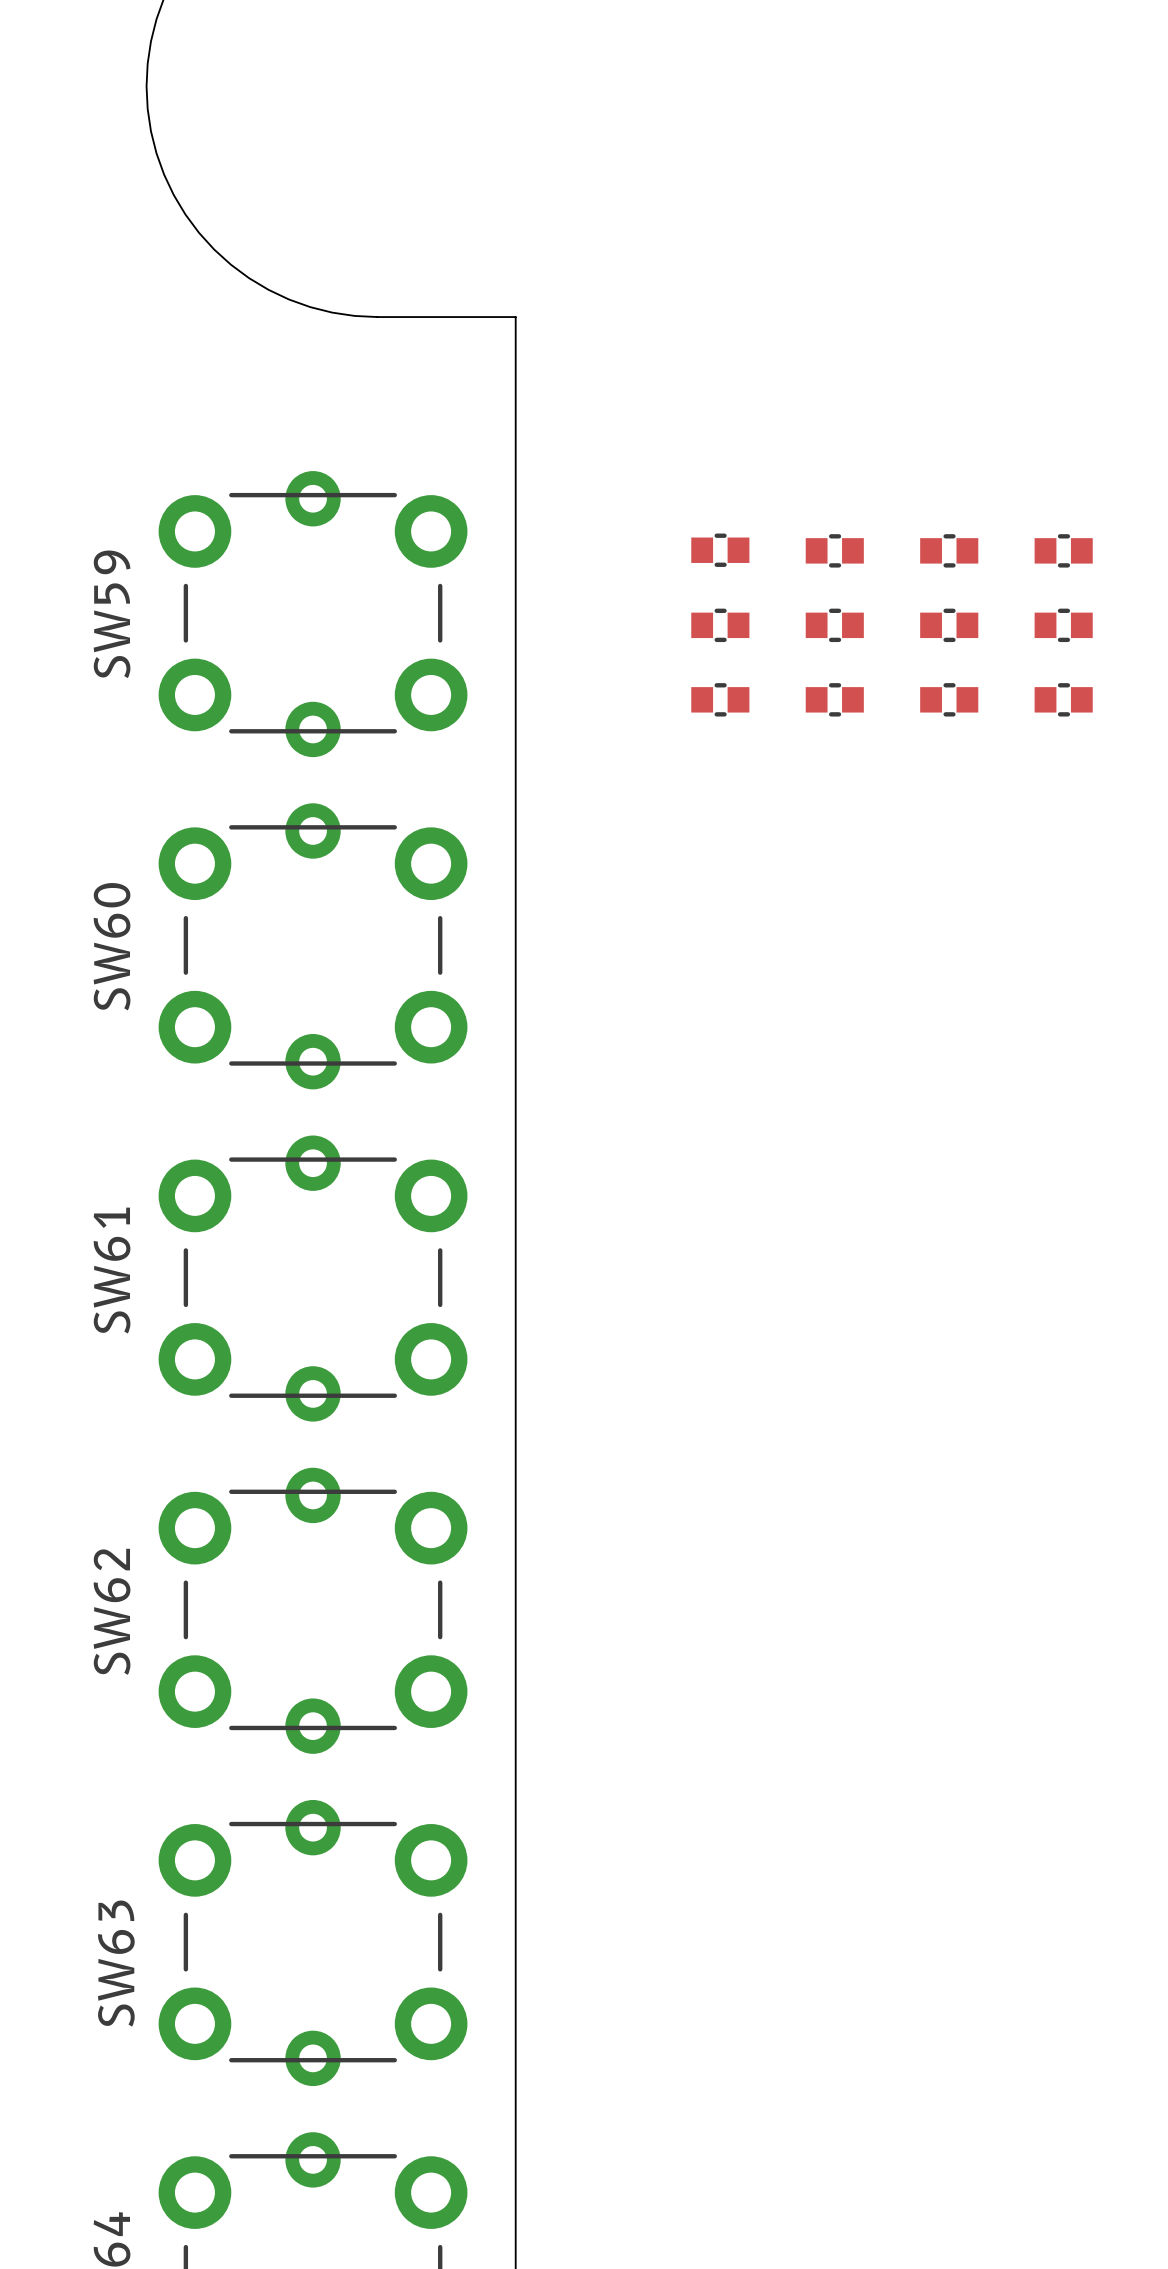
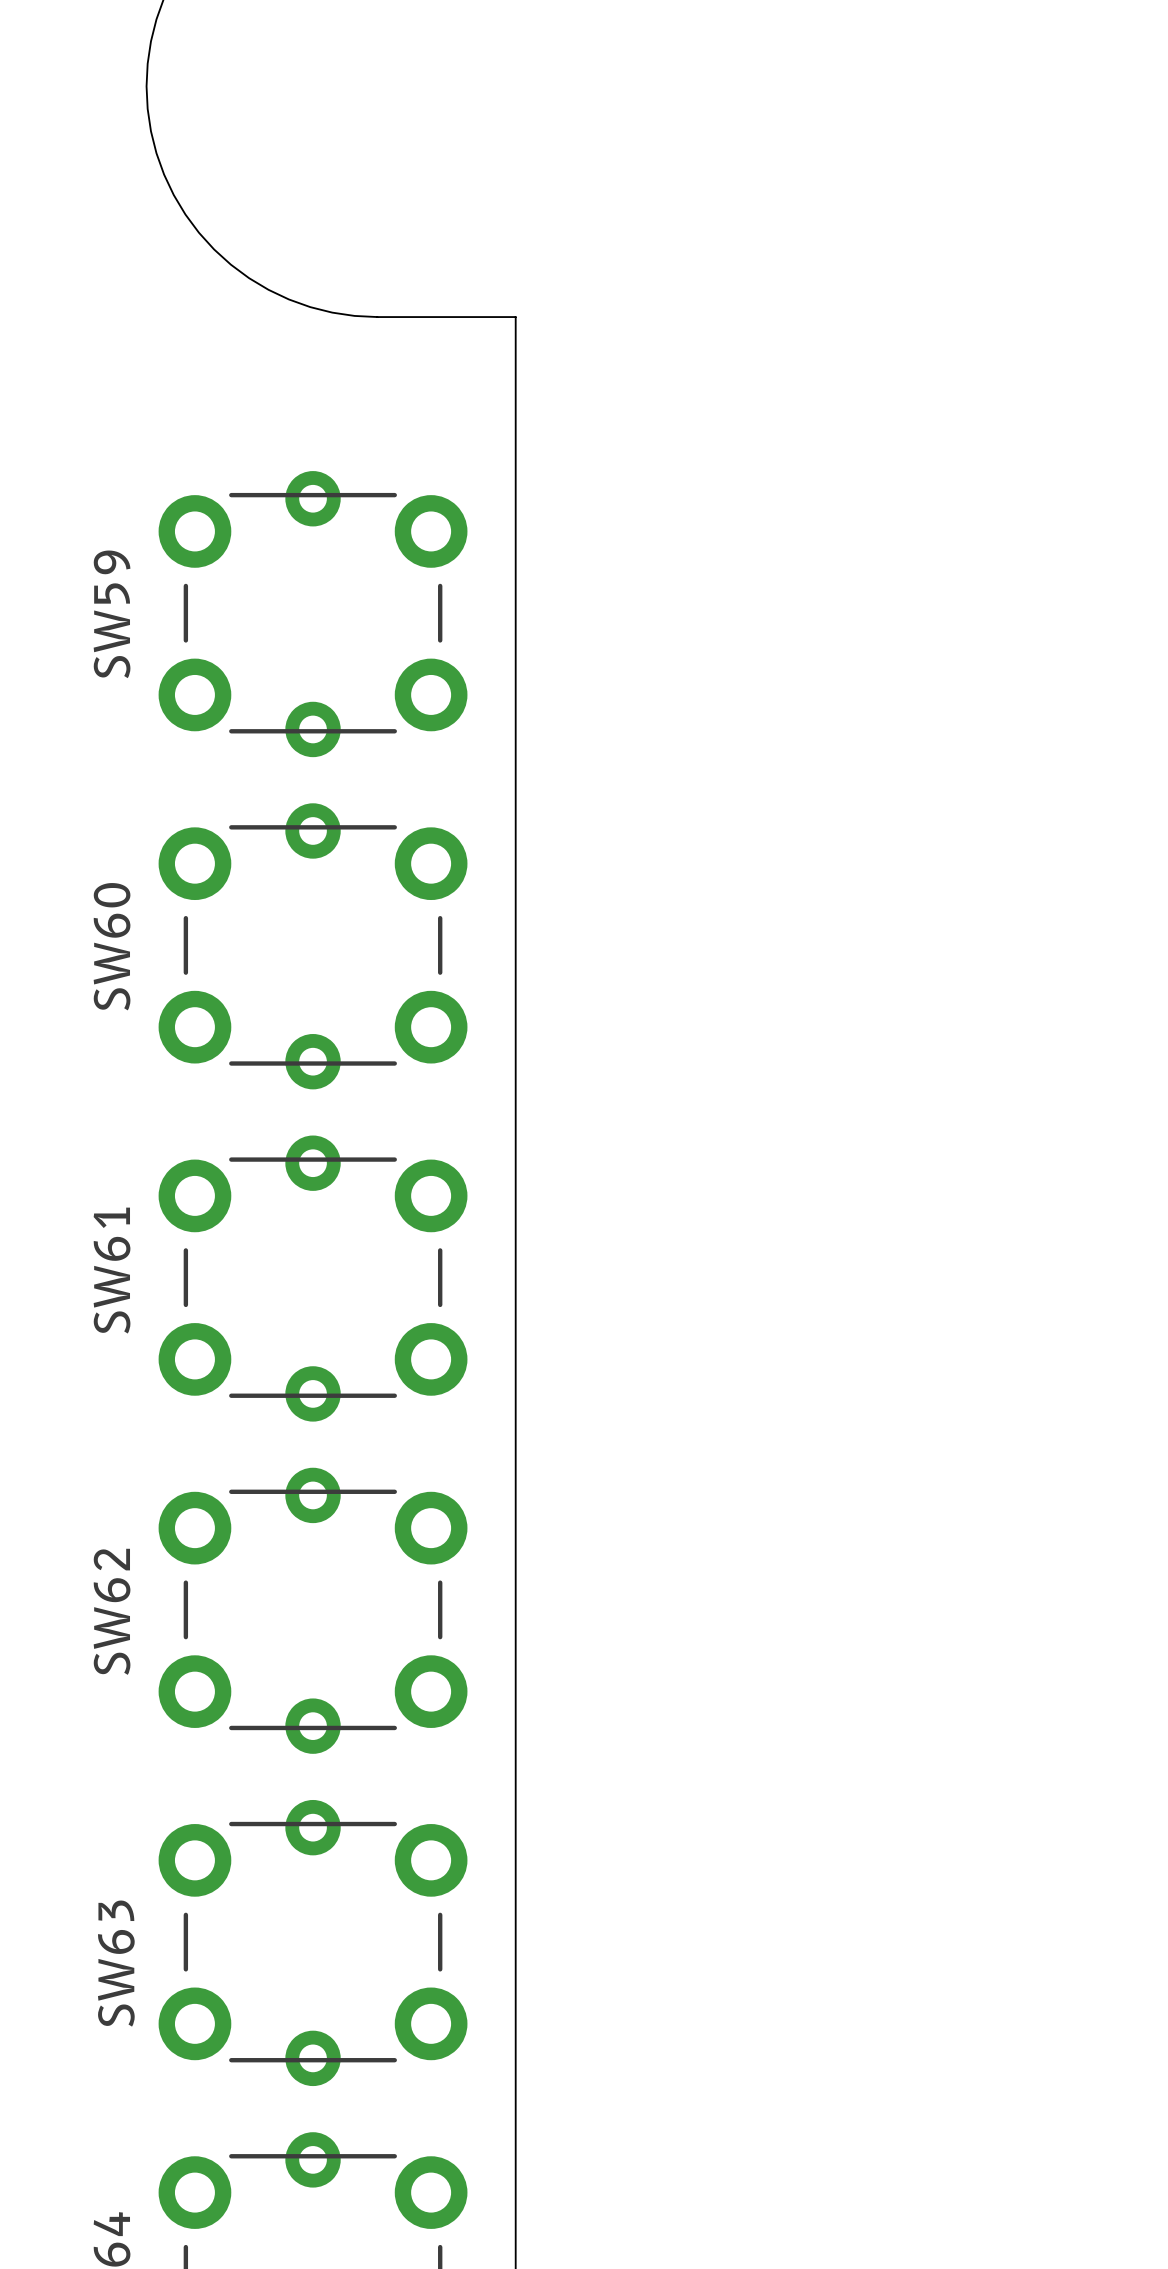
part: (720, 550) -> none
part: (834, 550) -> none
part: (949, 550) -> none
part: (1063, 550) -> none
part: (720, 625) -> none
part: (834, 625) -> none
part: (949, 625) -> none
part: (1063, 625) -> none
part: (720, 699) -> none
part: (834, 699) -> none
part: (949, 699) -> none
part: (1063, 699) -> none

